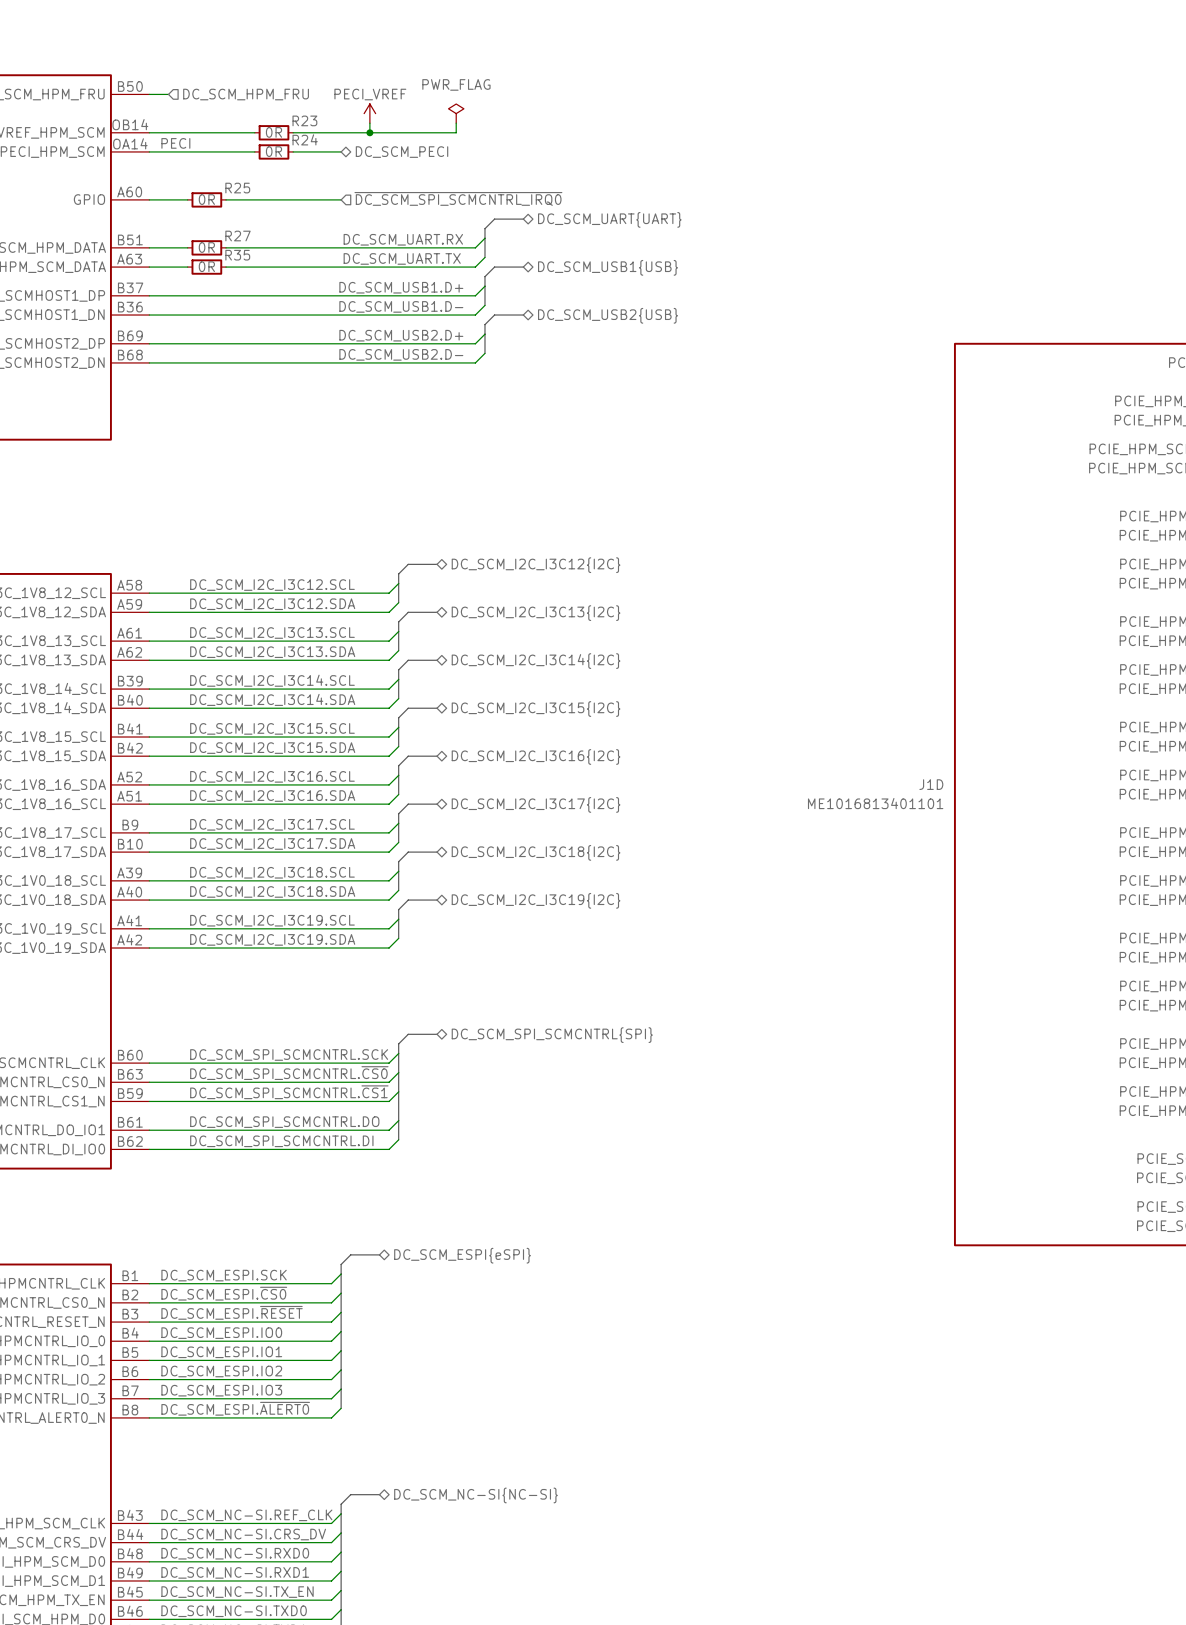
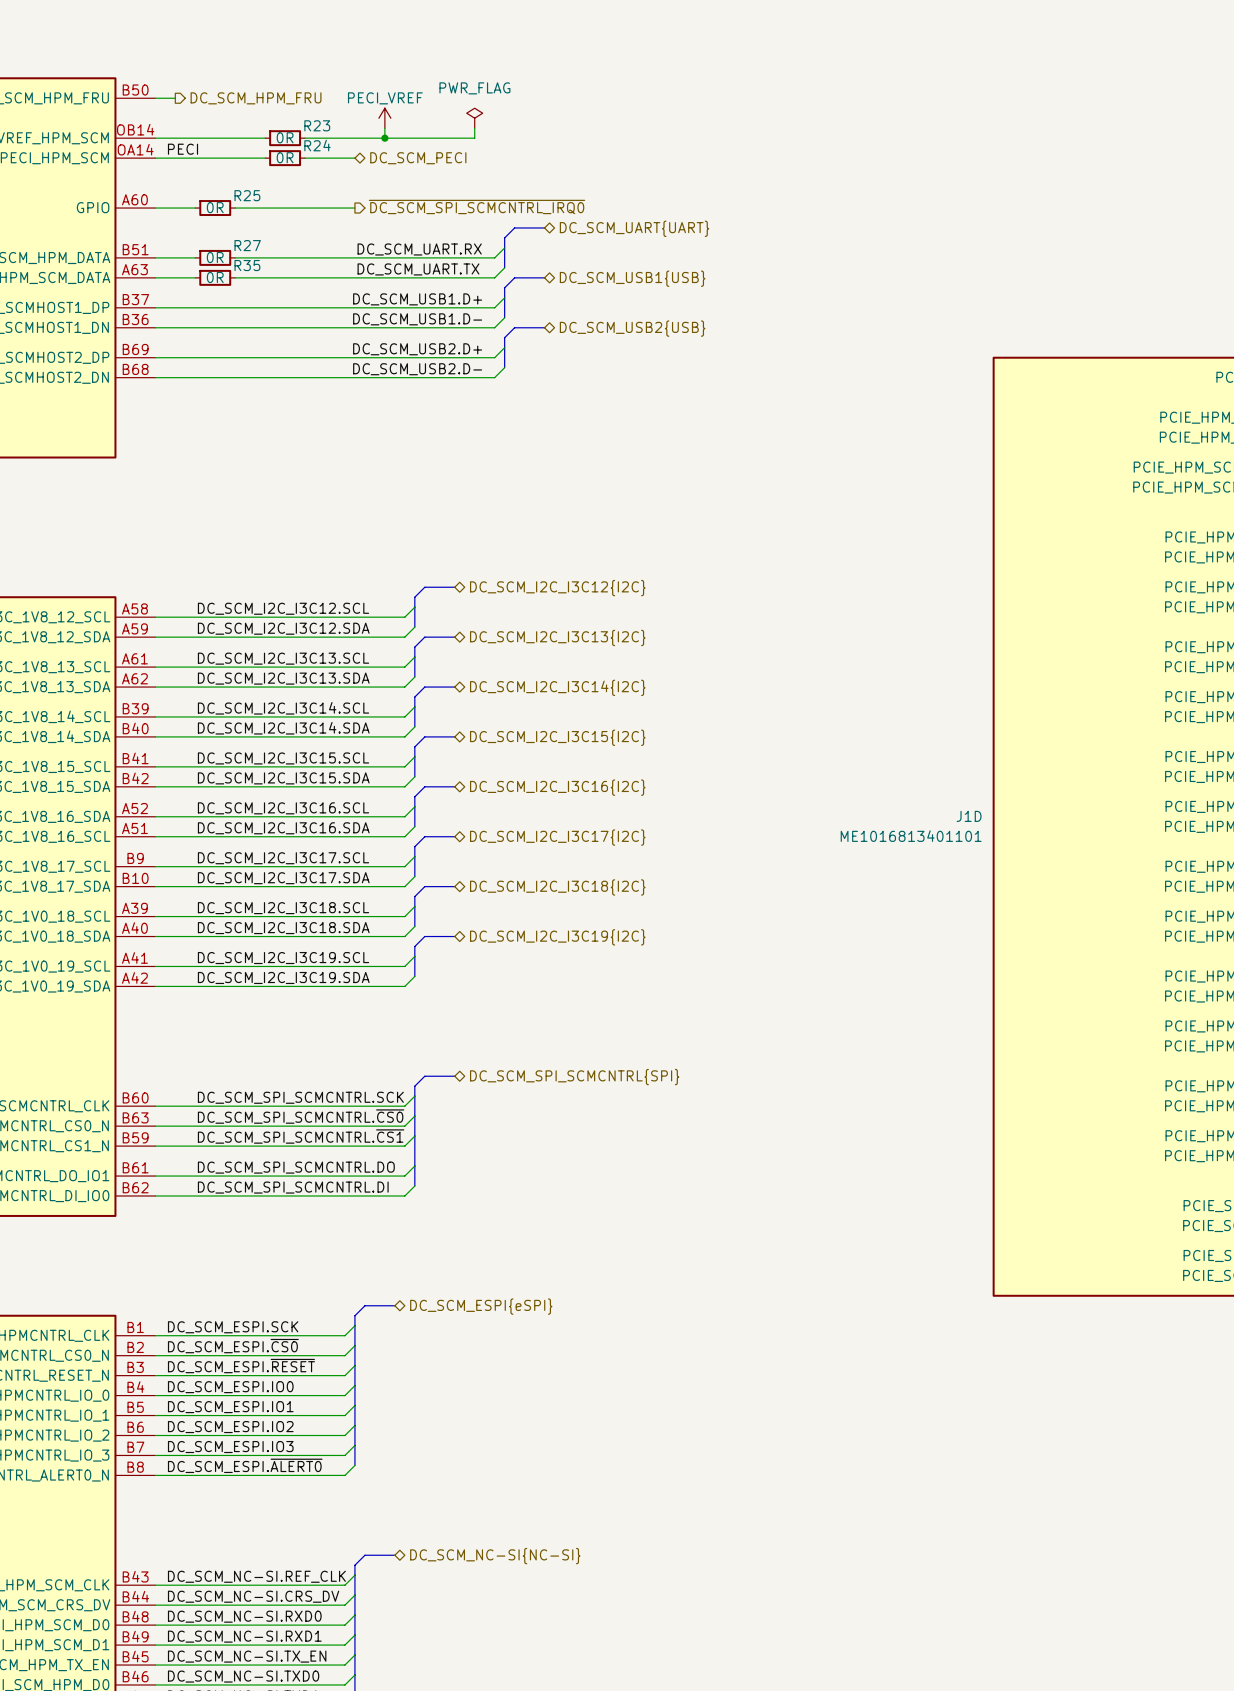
hierarchical label shape: input (246, 94) -> output (256, 98)
hierarchical label shape: input (458, 198) -> output (477, 206)

